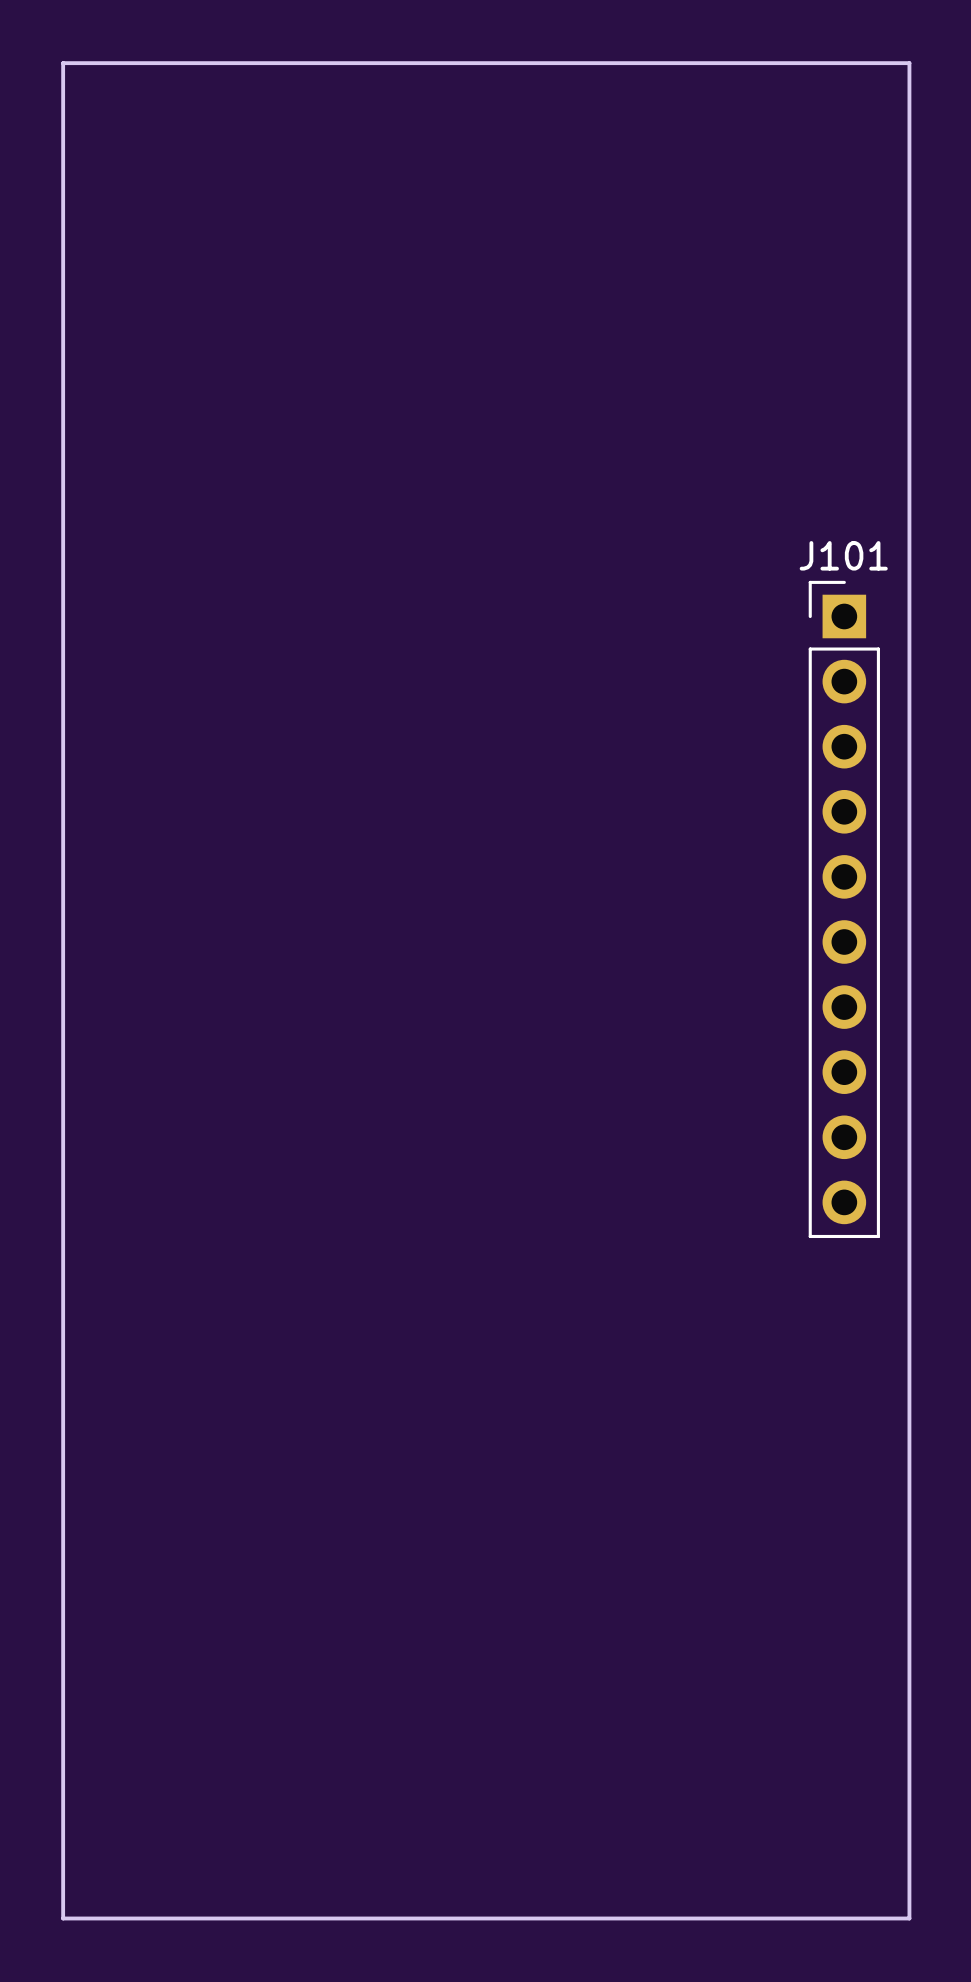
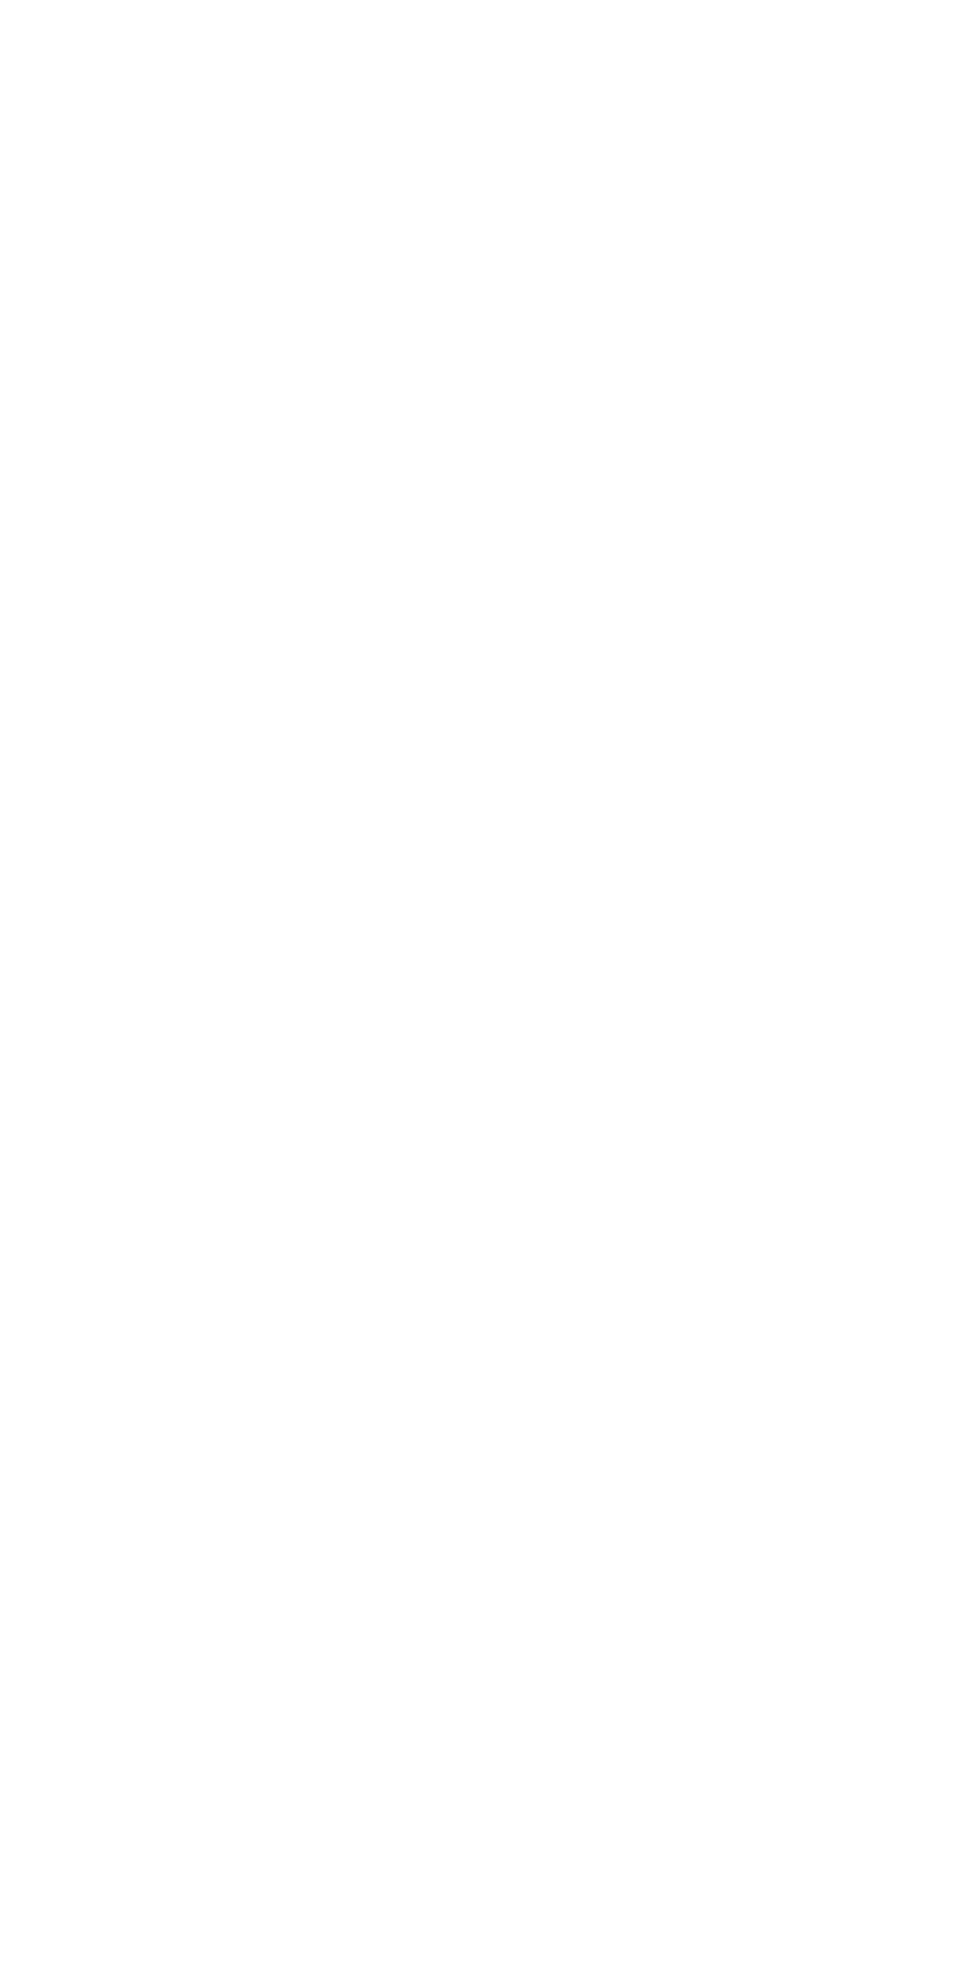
board edge: (63, 63) (63, 1918) (909, 1918) (909, 63) (63, 63) -> none
J101: (844, 909) -> none

